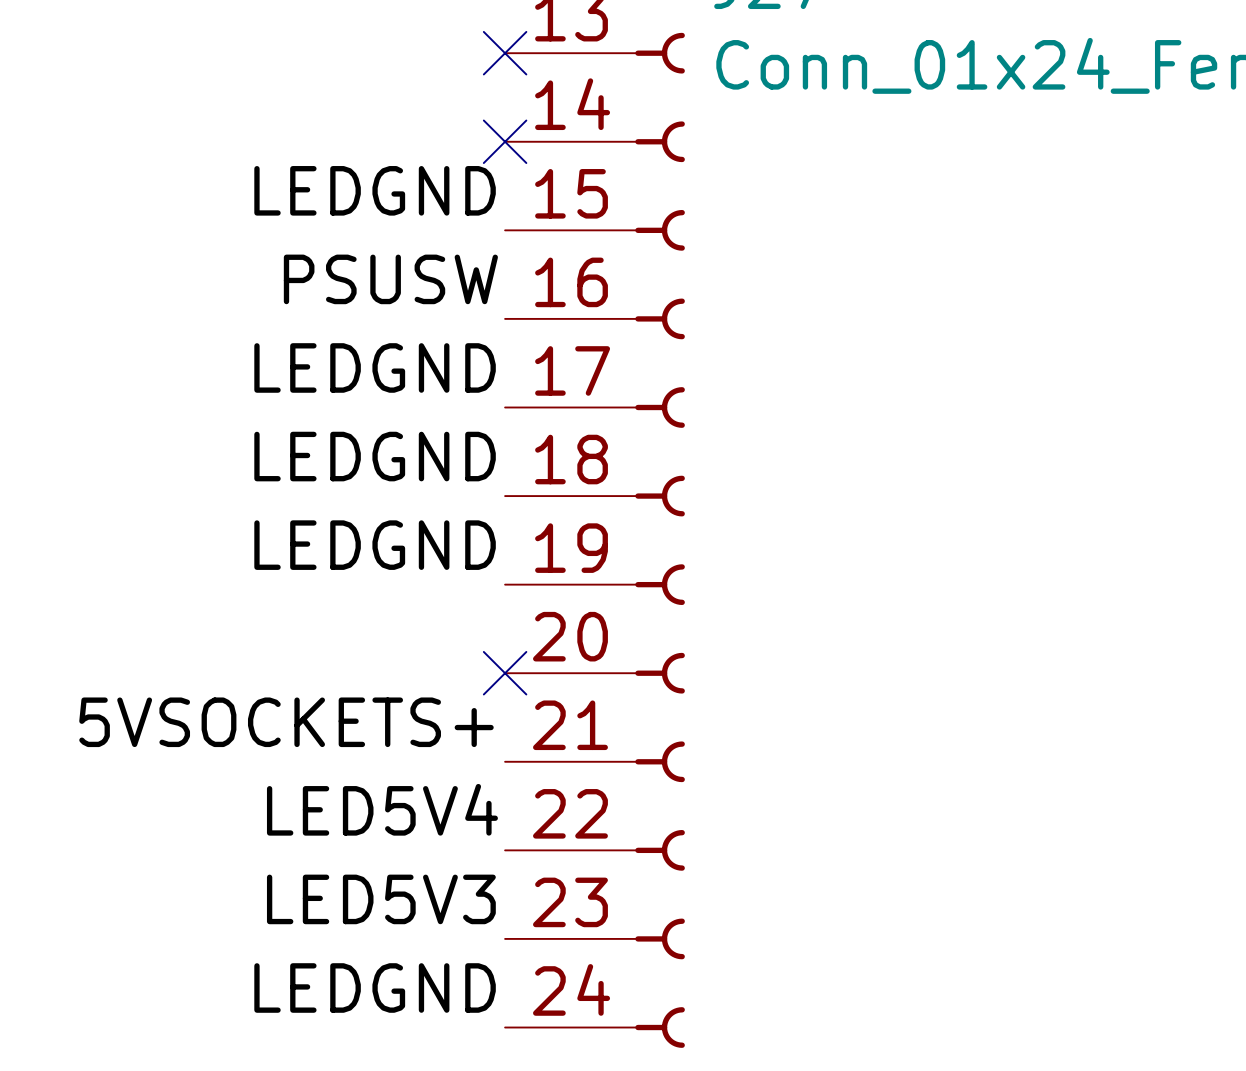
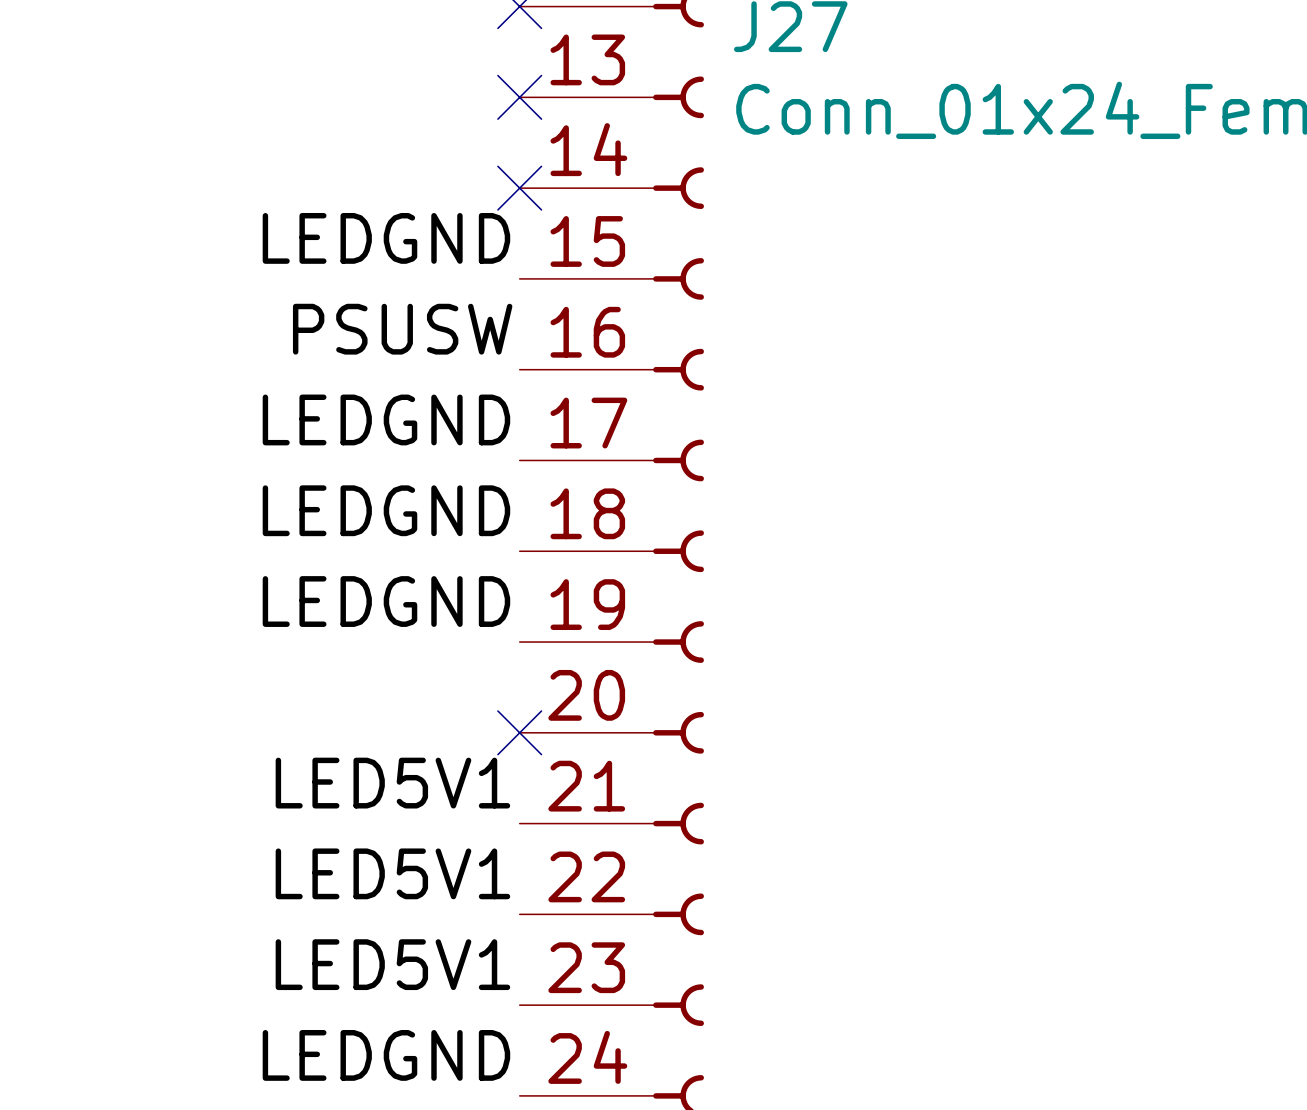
label: 5VSOCKETS+ (286, 722) -> LED5V1 (392, 783)
label: LED5V4 (382, 809) -> LED5V1 (392, 873)
label: LED5V3 (381, 899) -> LED5V1 (392, 964)

